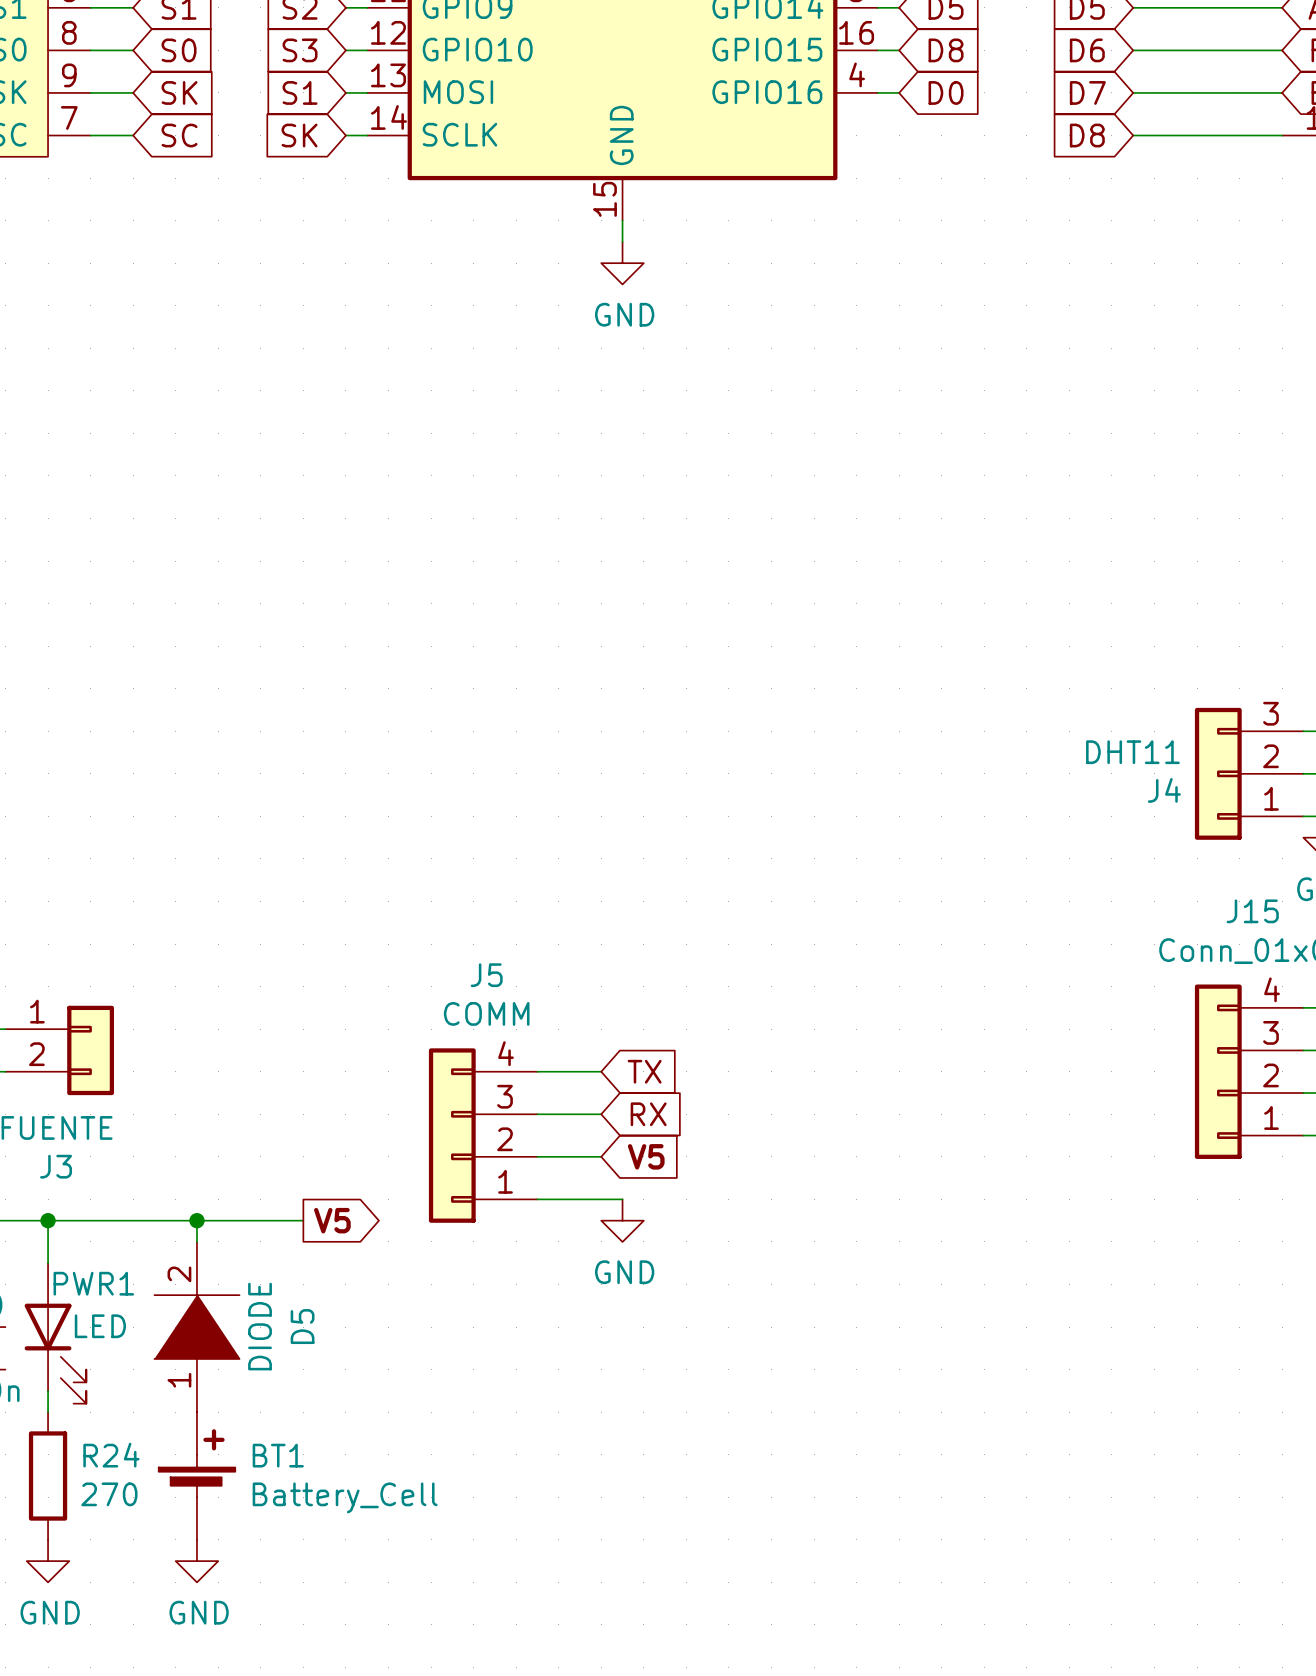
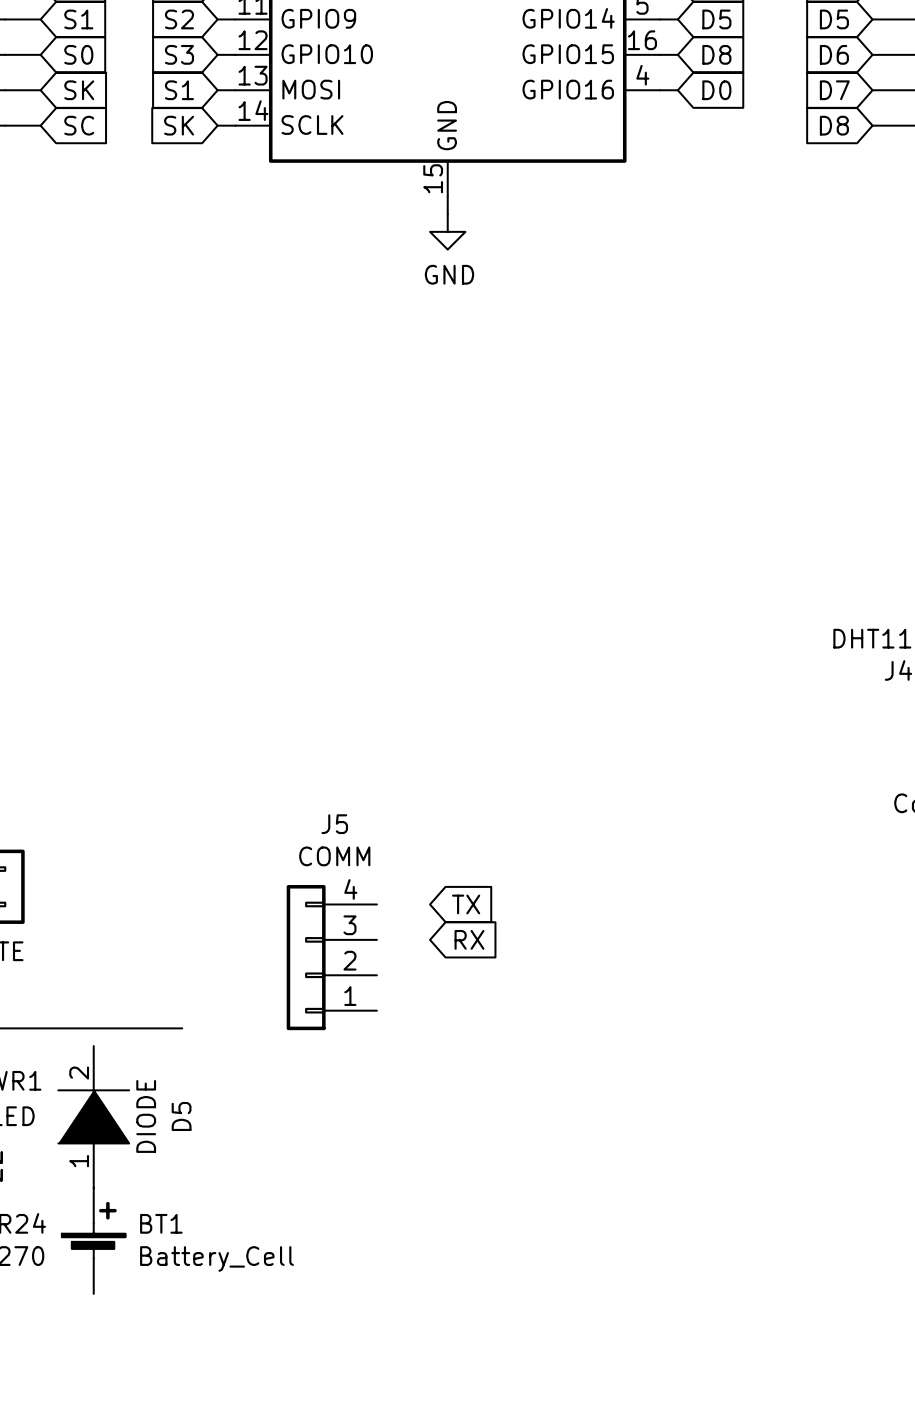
wire: (537, 1071) (601, 1071) -> none
wire: (537, 1114) (601, 1114) -> none
wire: (537, 1156) (601, 1156) -> none
global label: V5 (646, 1156) -> none
wire: (537, 1199) (622, 1199) -> none
wire: (196, 1220) (196, 1241) -> none
junction: (196, 1220) -> none
global label: V5 (332, 1220) -> none
power symbol: GND (622, 1220) -> none
power symbol: GND (196, 1561) -> none

